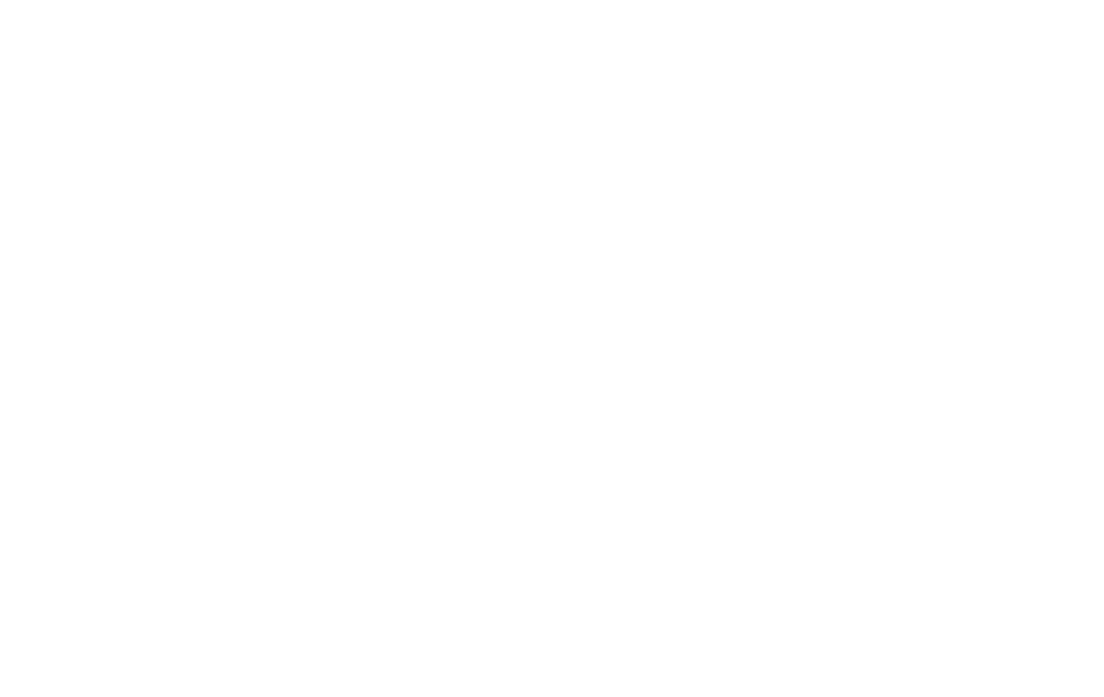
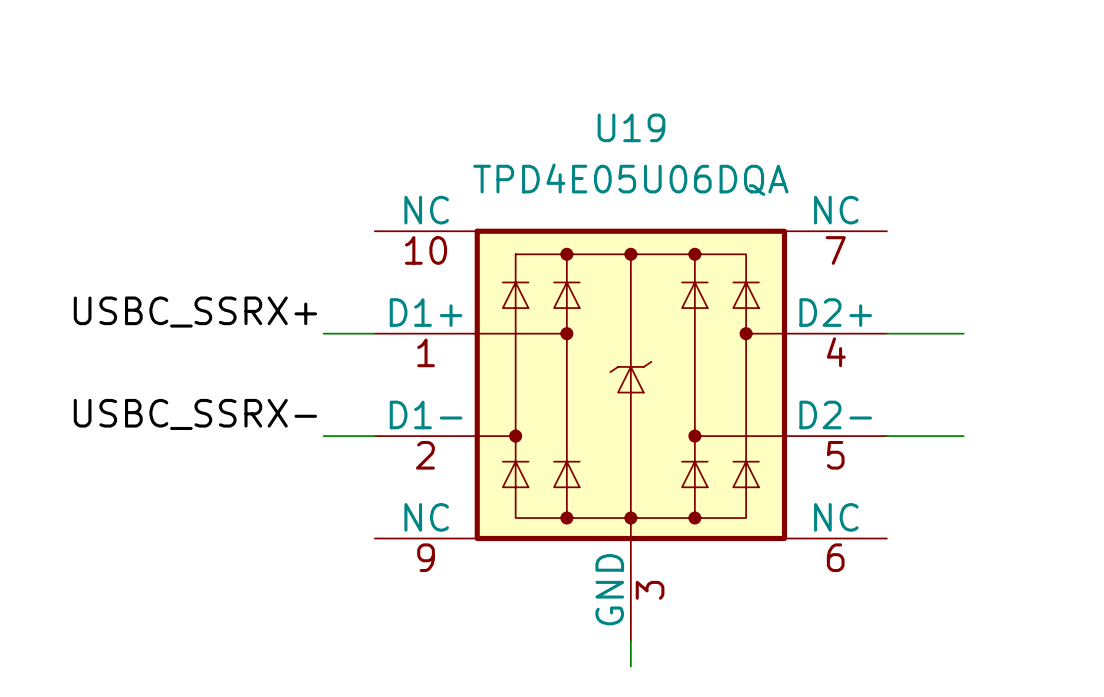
label: none -> USBC_SSRX+ (195, 312)
wire: none -> (323, 333) (374, 333)
wire: none -> (886, 333) (963, 333)
label: none -> USBC_SSRX- (195, 414)
U19: none -> TPD4E05U06DQA (630, 434)
wire: none -> (323, 436) (374, 436)
wire: none -> (886, 436) (963, 436)
wire: none -> (630, 640) (630, 666)

